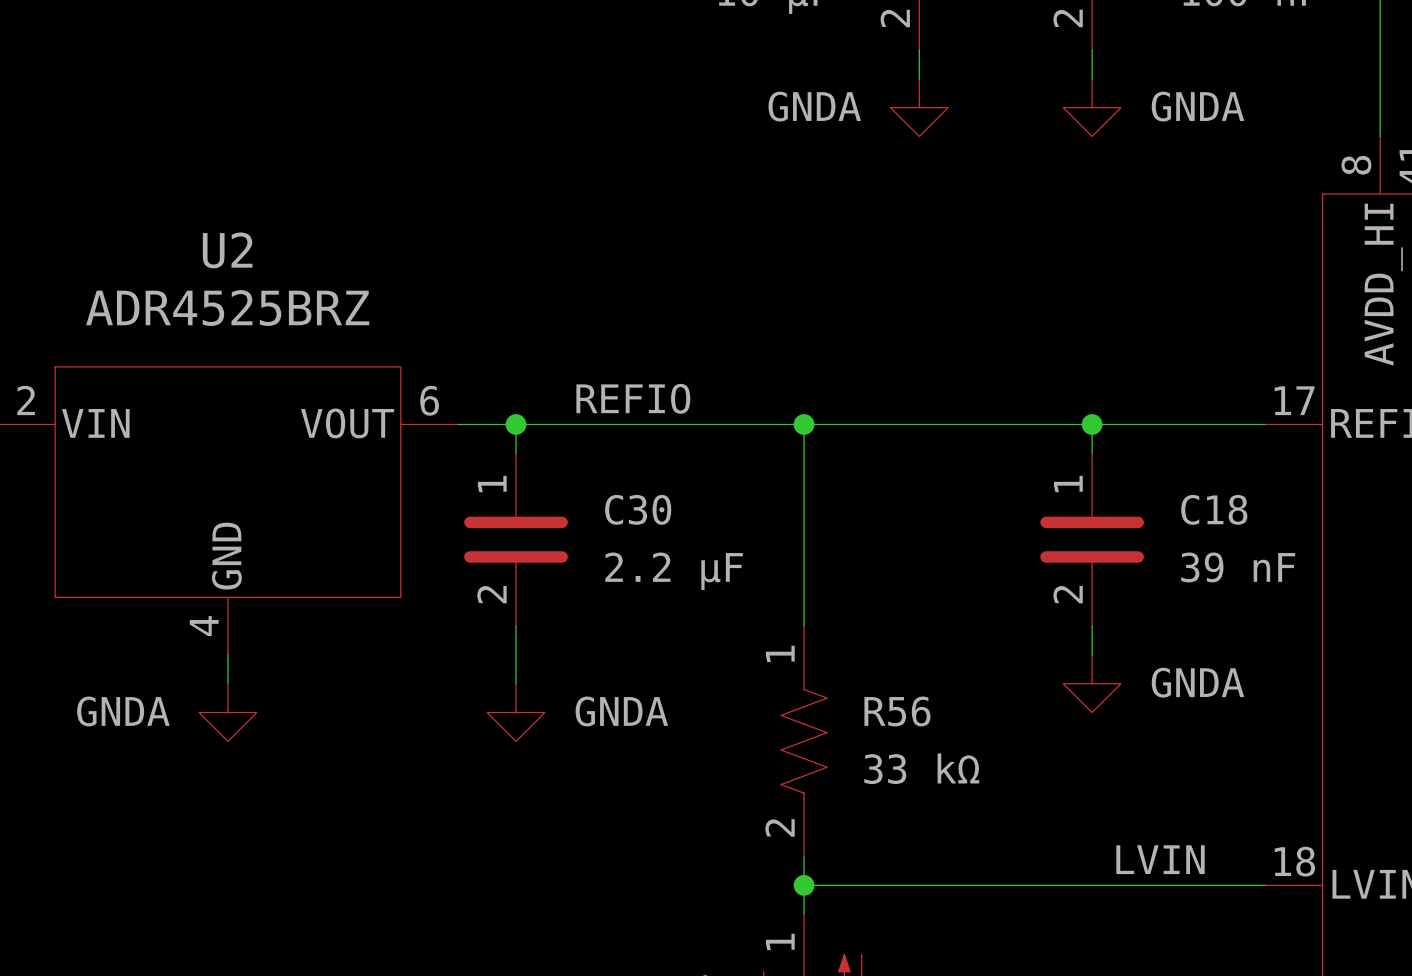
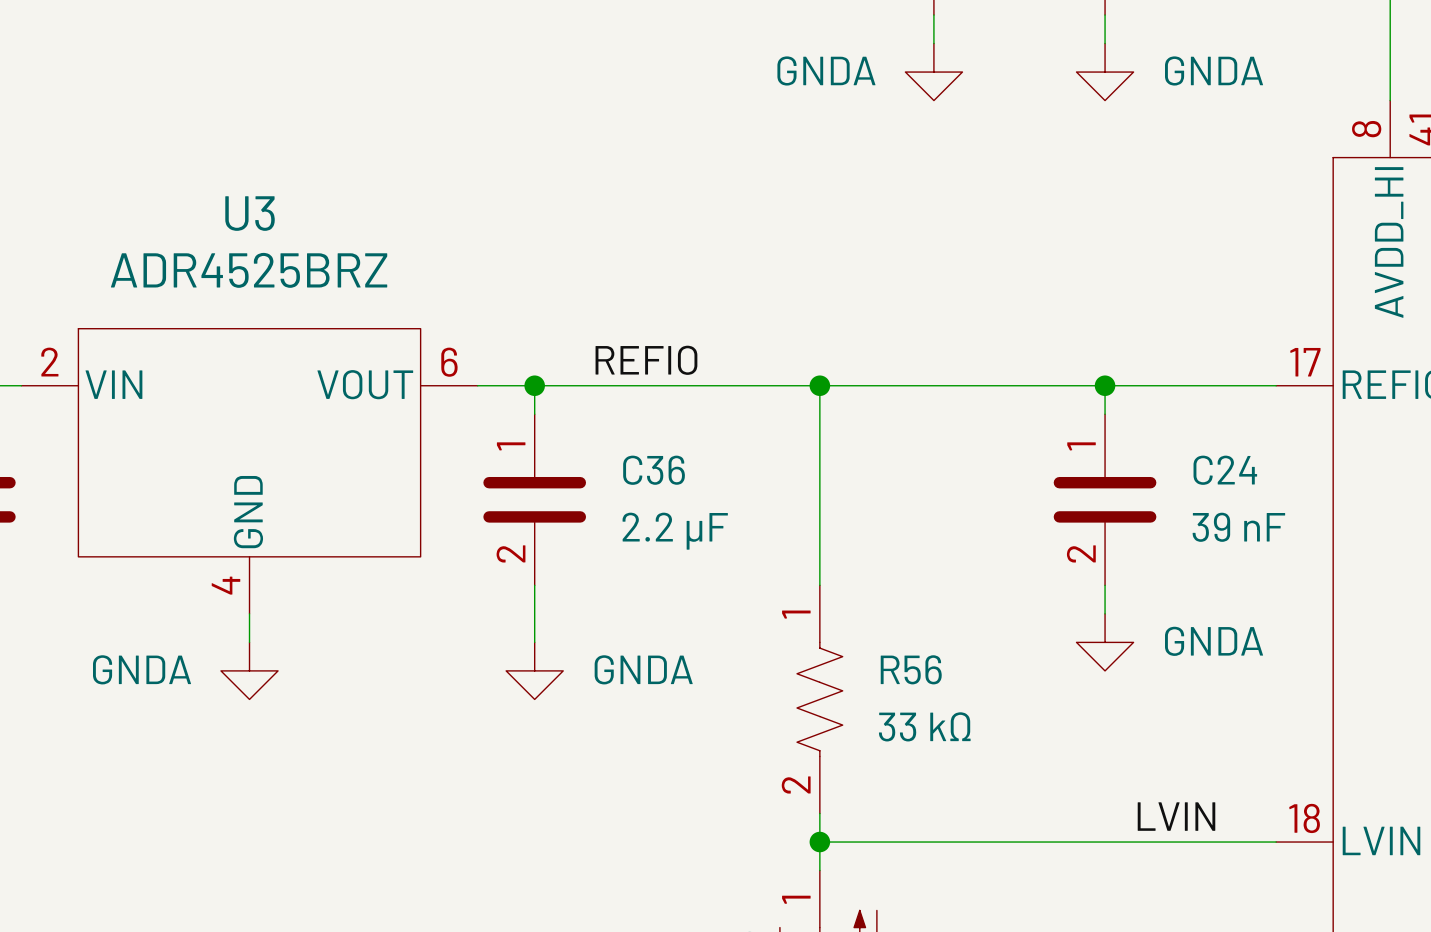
U2 name: U2 (227, 250) -> U3 (250, 213)
C30 name: C30 (638, 509) -> C36 (654, 470)
C18 name: C18 (1214, 509) -> C24 (1225, 470)

